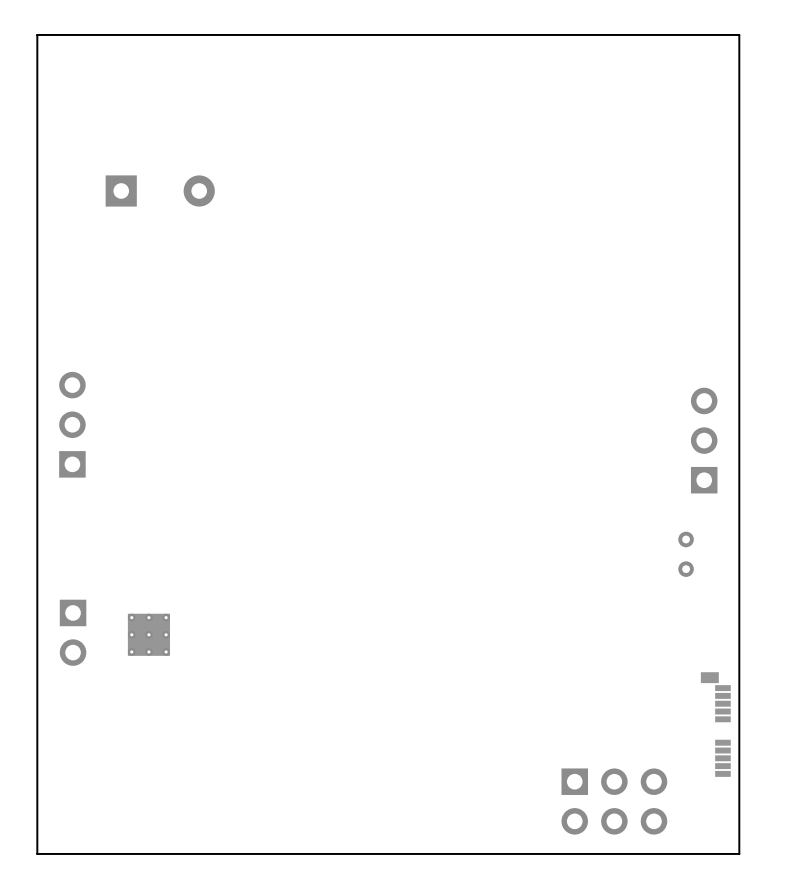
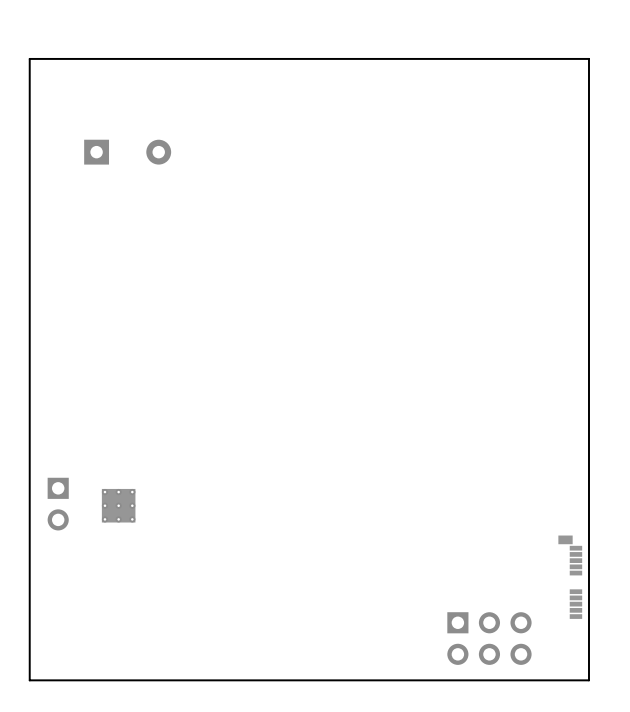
board edge: (739, 73) (739, 34) (37, 34) (37, 73) -> (588, 58) (29, 58)
part: (72, 424) -> none
part: (704, 440) -> none
part: (686, 554) -> none

